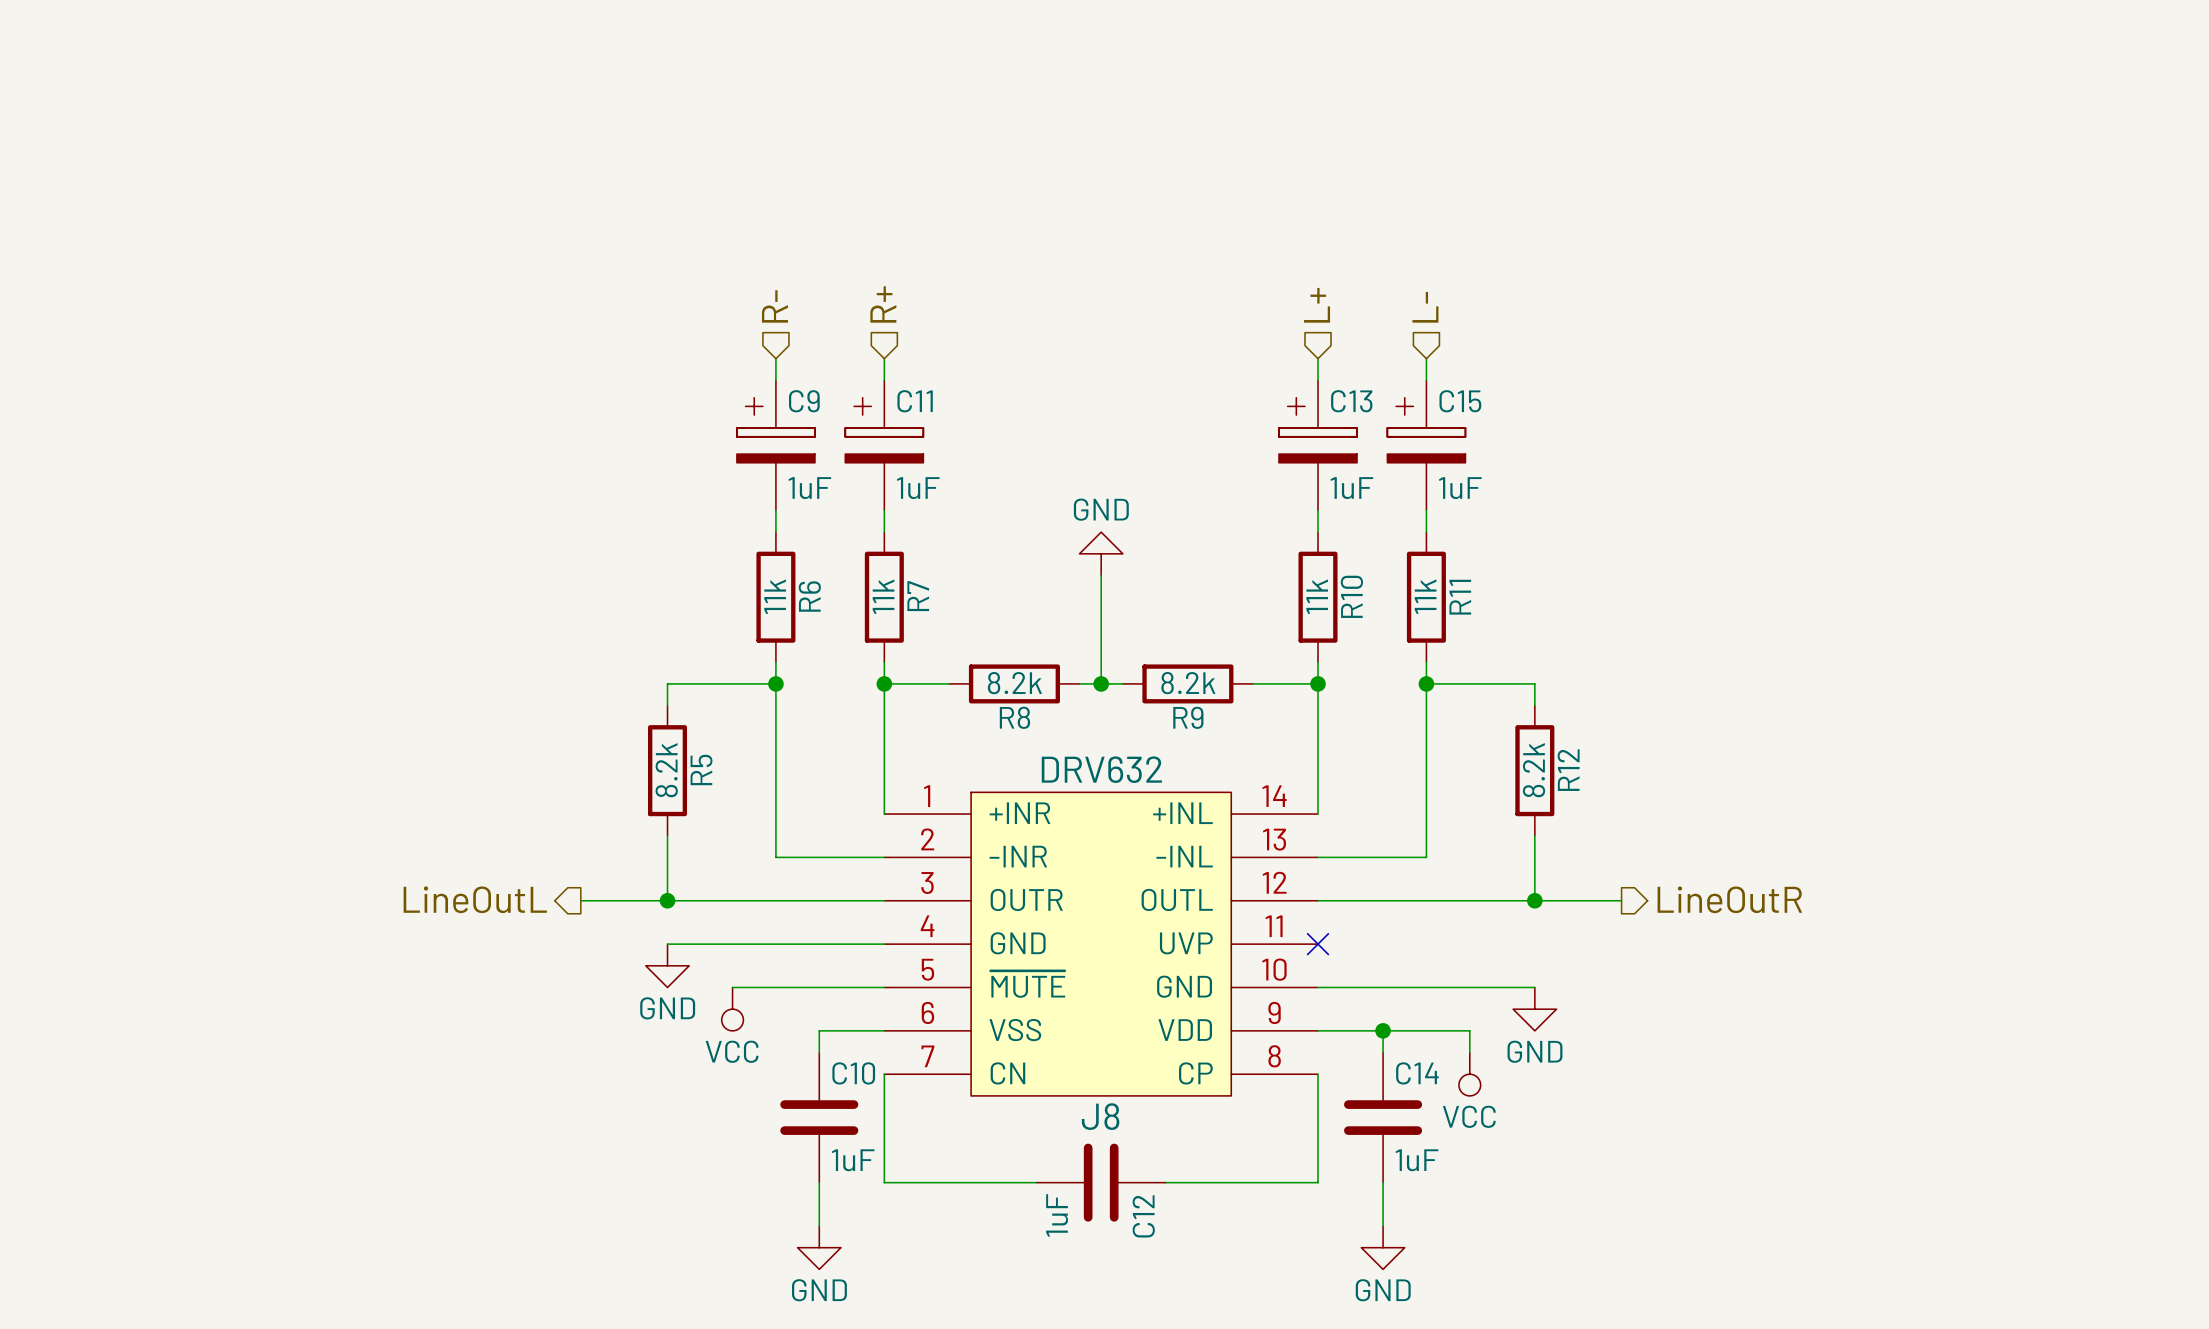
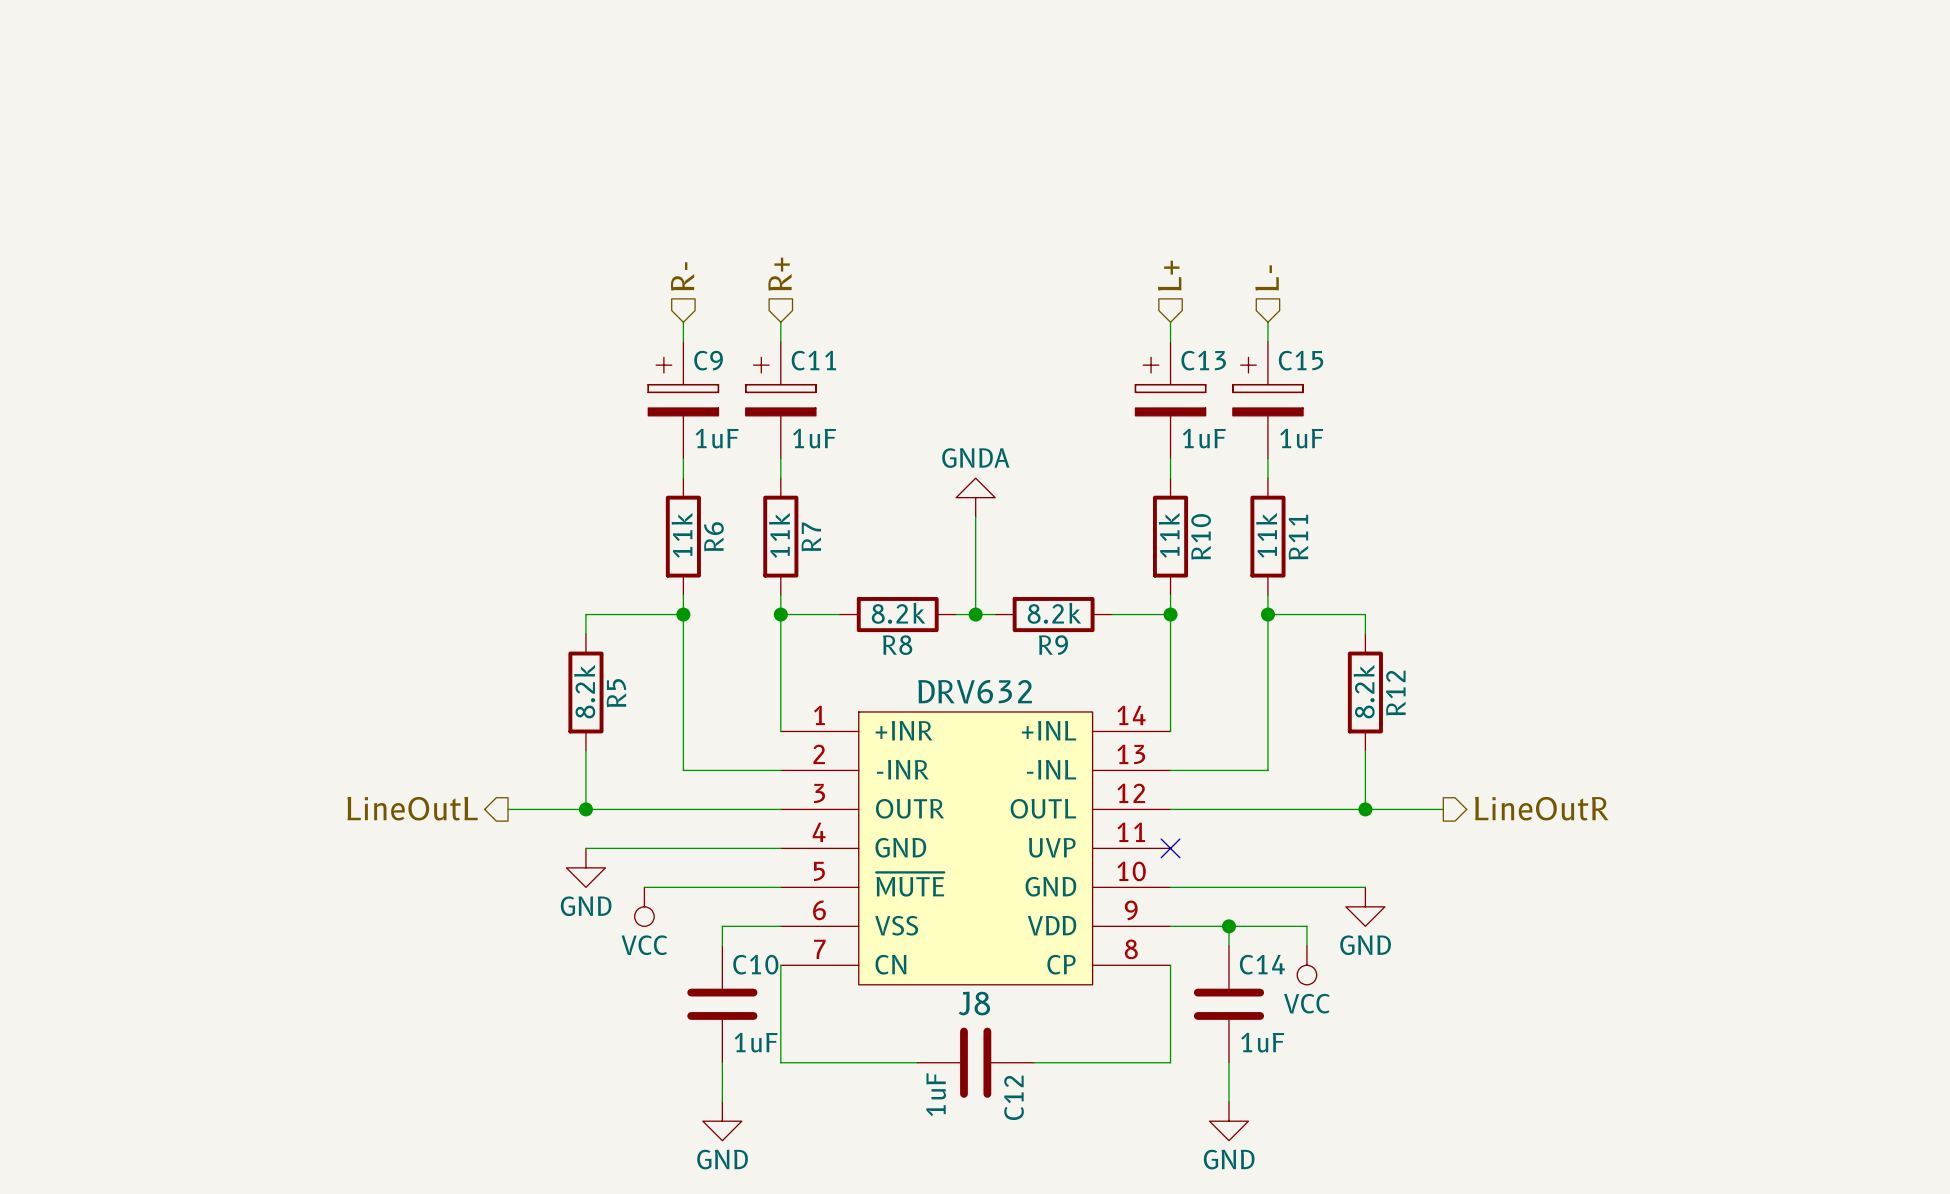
power symbol: GND (1101, 553) -> GNDA (975, 497)

